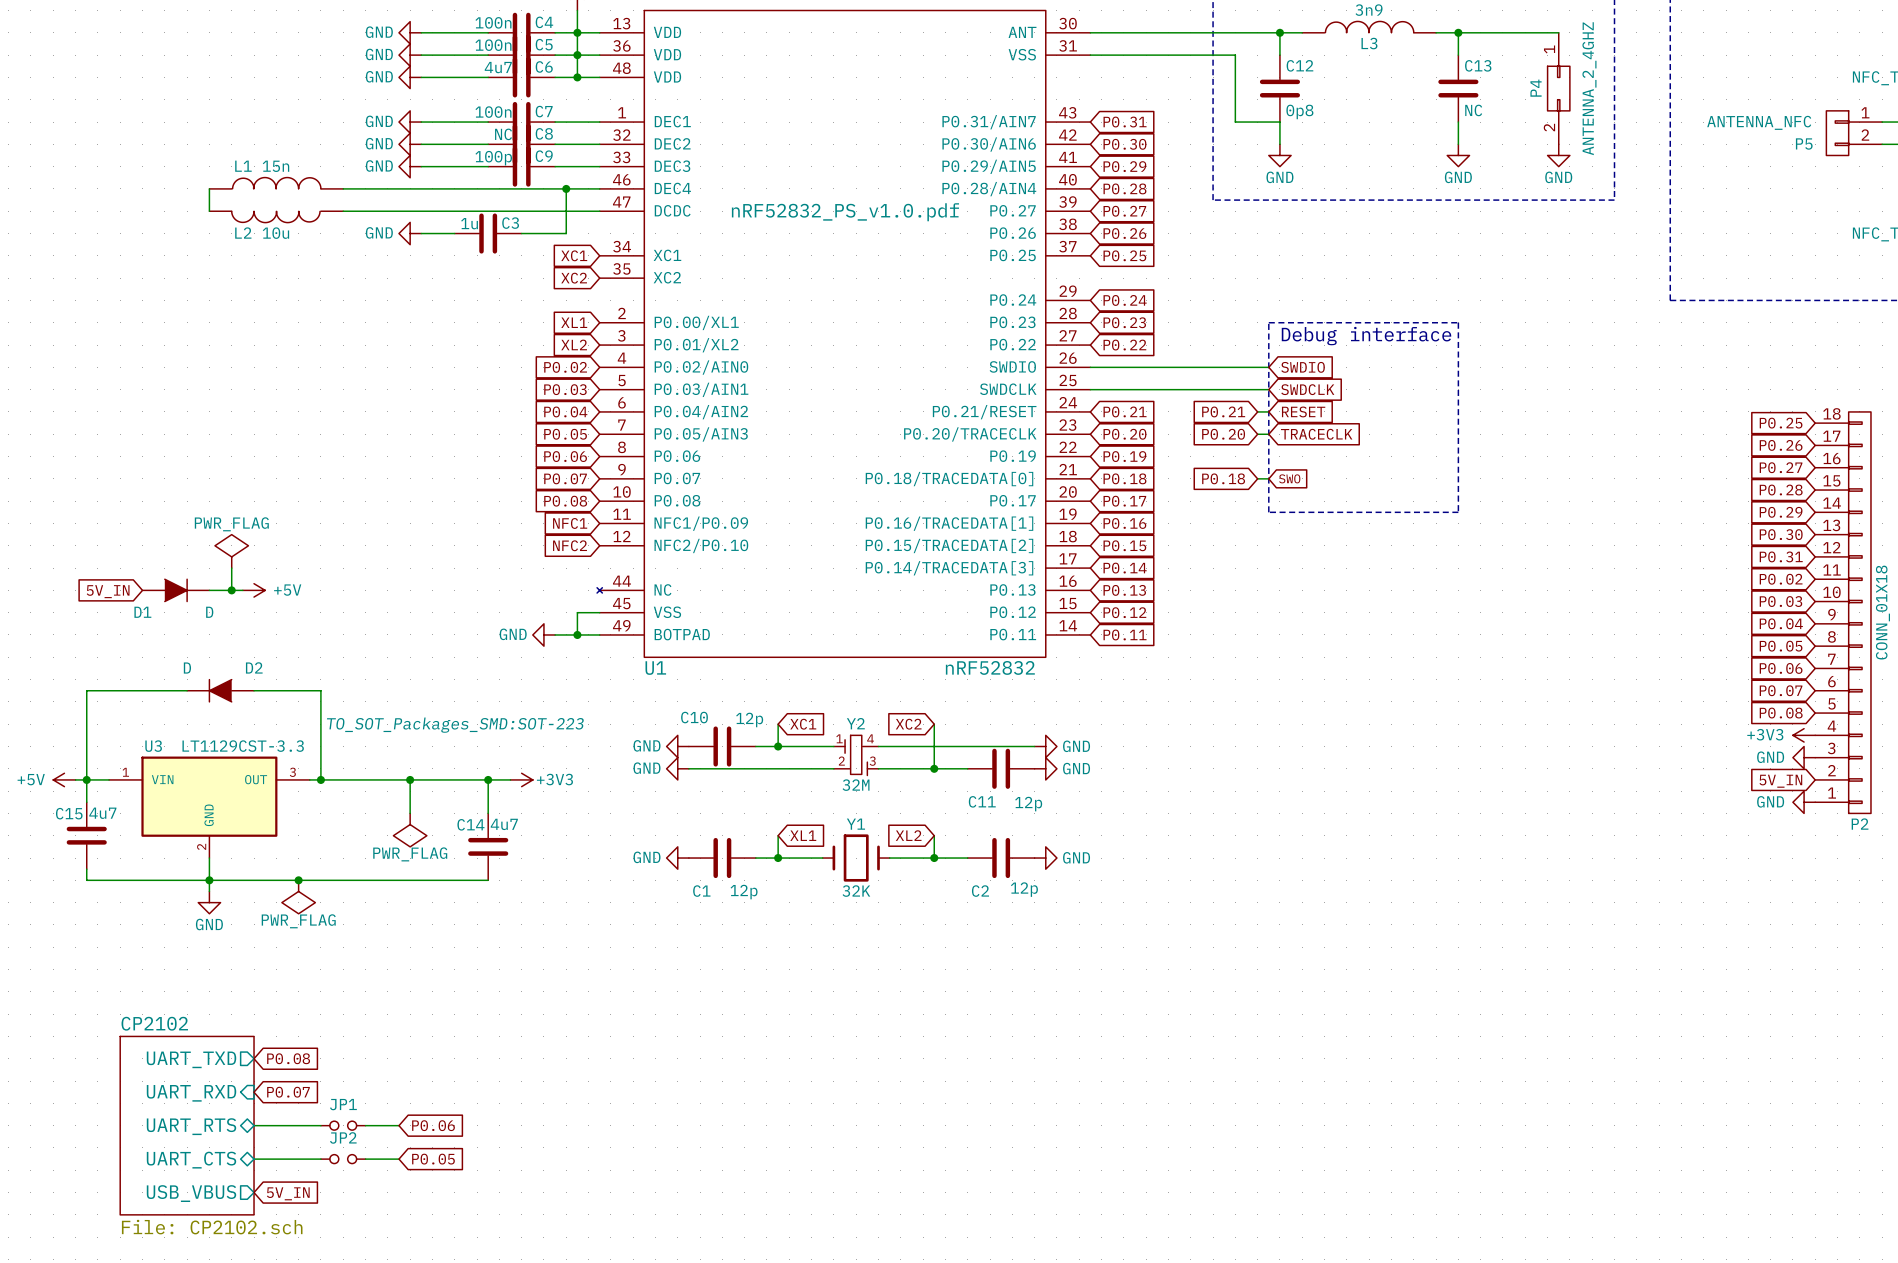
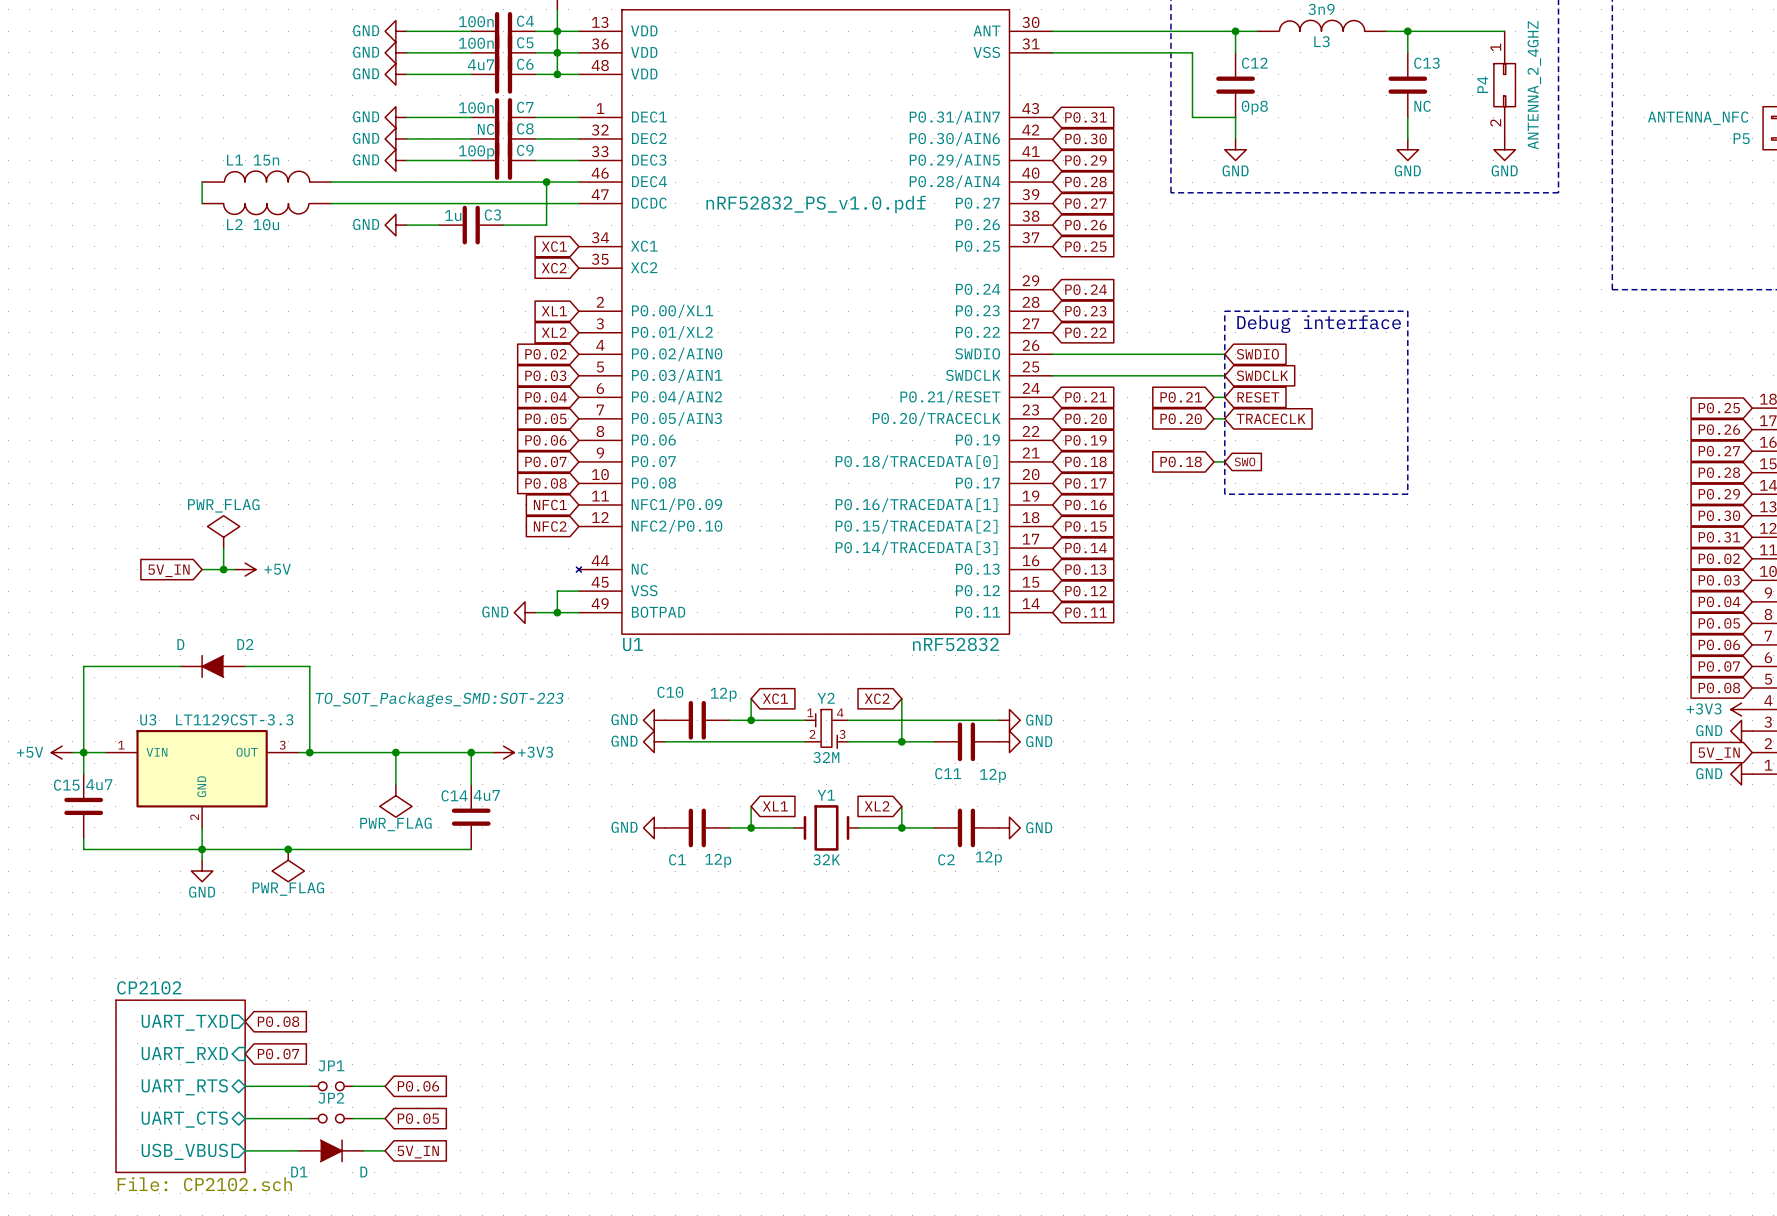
D1 position: (175, 590) -> (331, 1150)
global label position: 5V_IN (108, 591) -> 5V_IN (168, 570)
wire: none -> (245, 1150) (298, 1150)
wire: none -> (363, 1150) (385, 1150)
global label position: 5V_IN (288, 1193) -> 5V_IN (418, 1152)

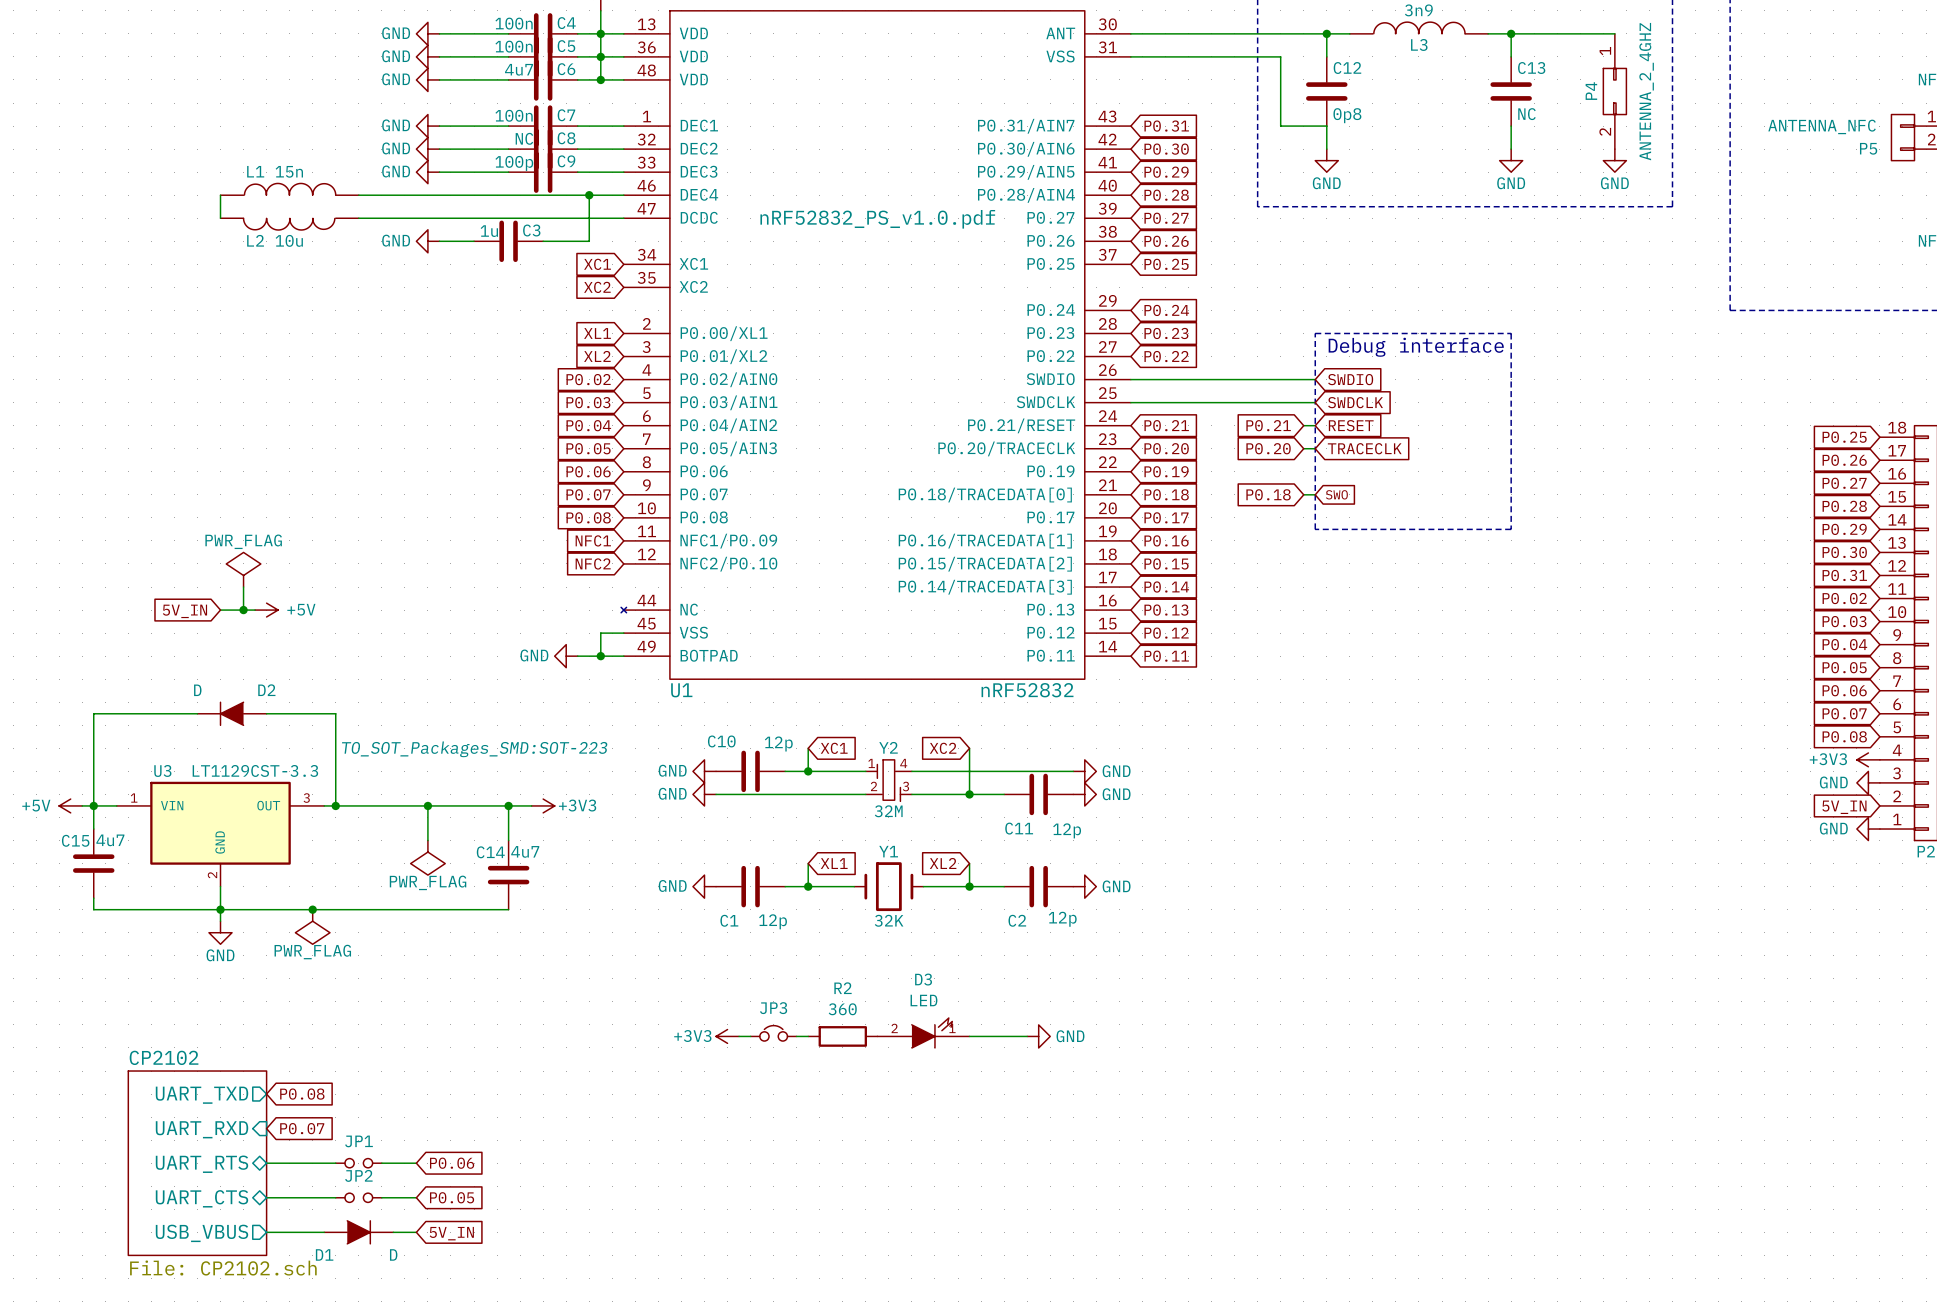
JP3: none -> (773, 1033)
D3: none -> LED (923, 1032)
power symbol: none -> +3V3 (727, 1036)
wire: none -> (739, 1036) (750, 1036)
wire: none -> (796, 1036) (808, 1036)
R2: none -> 360 (842, 1036)
wire: none -> (969, 1036) (1027, 1036)
power symbol: none -> GND (1038, 1036)

